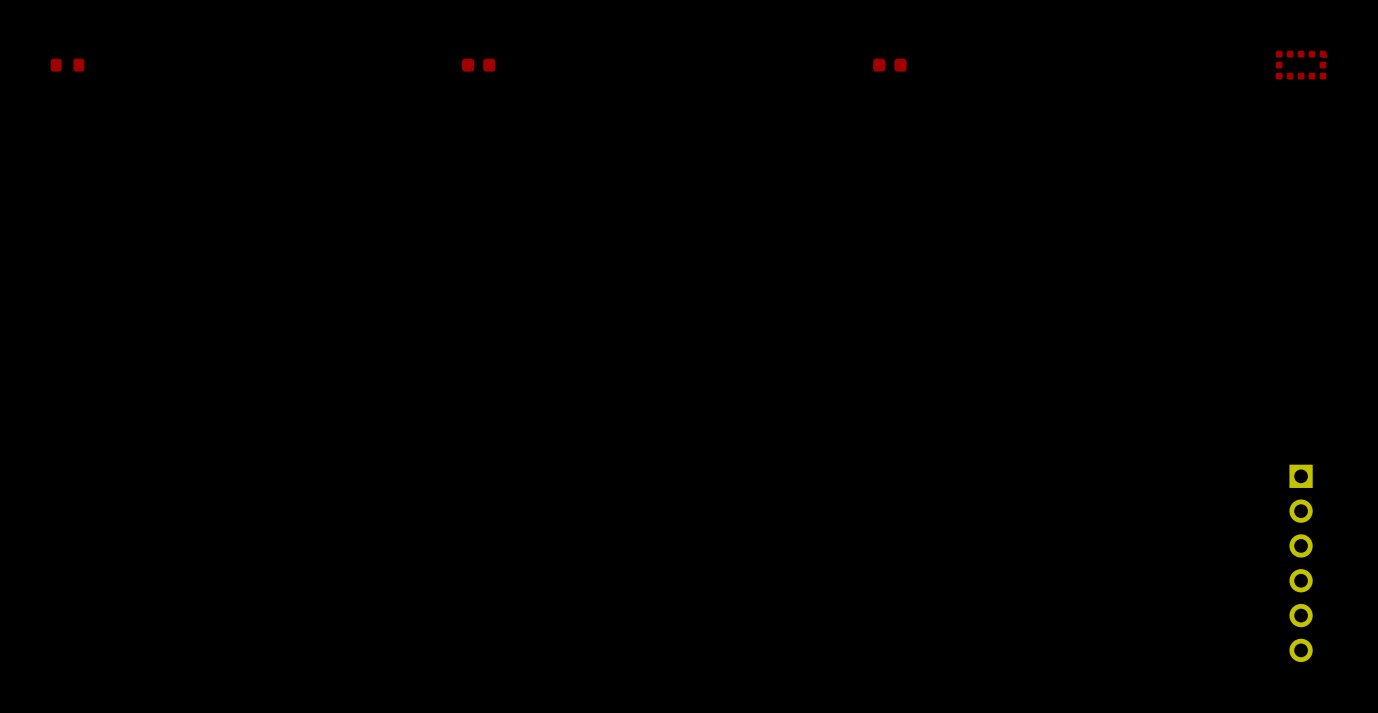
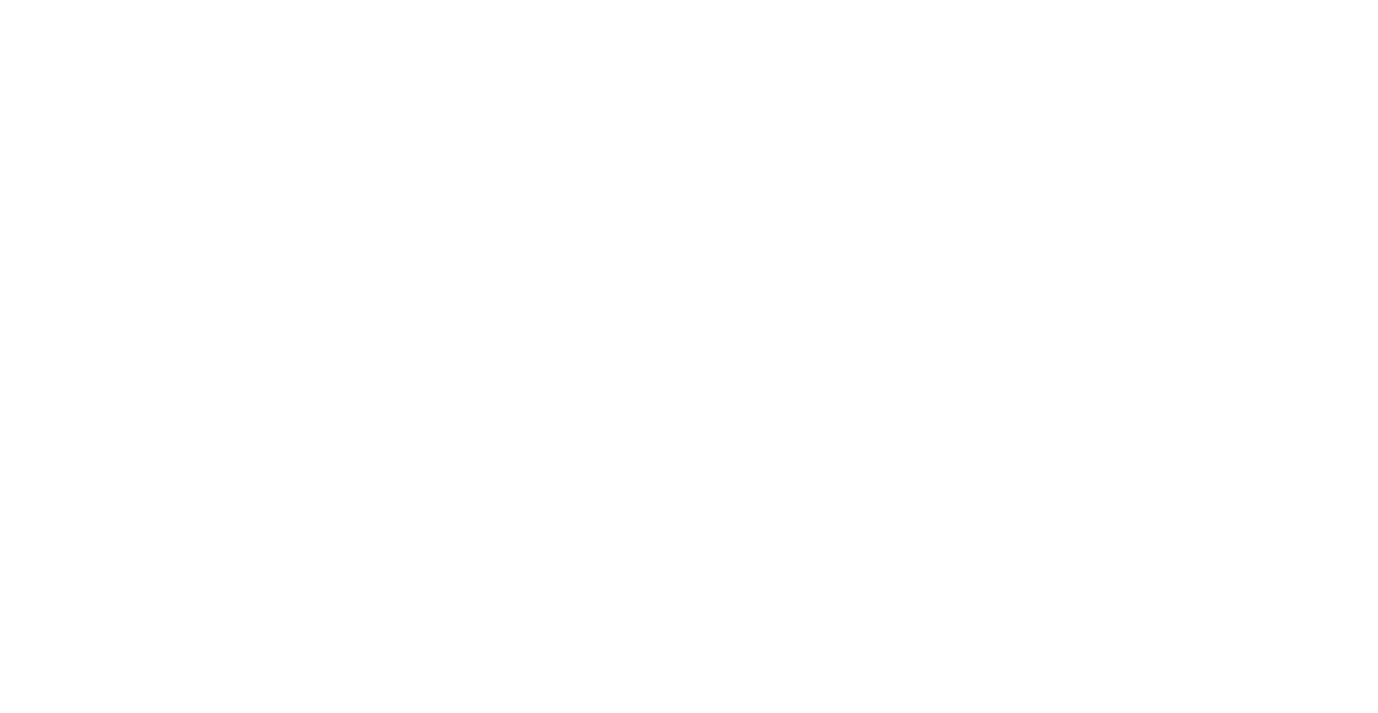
part: (67, 65) -> none
part: (478, 65) -> none
part: (889, 65) -> none
part: (1301, 65) -> none
part: (1301, 563) -> none

